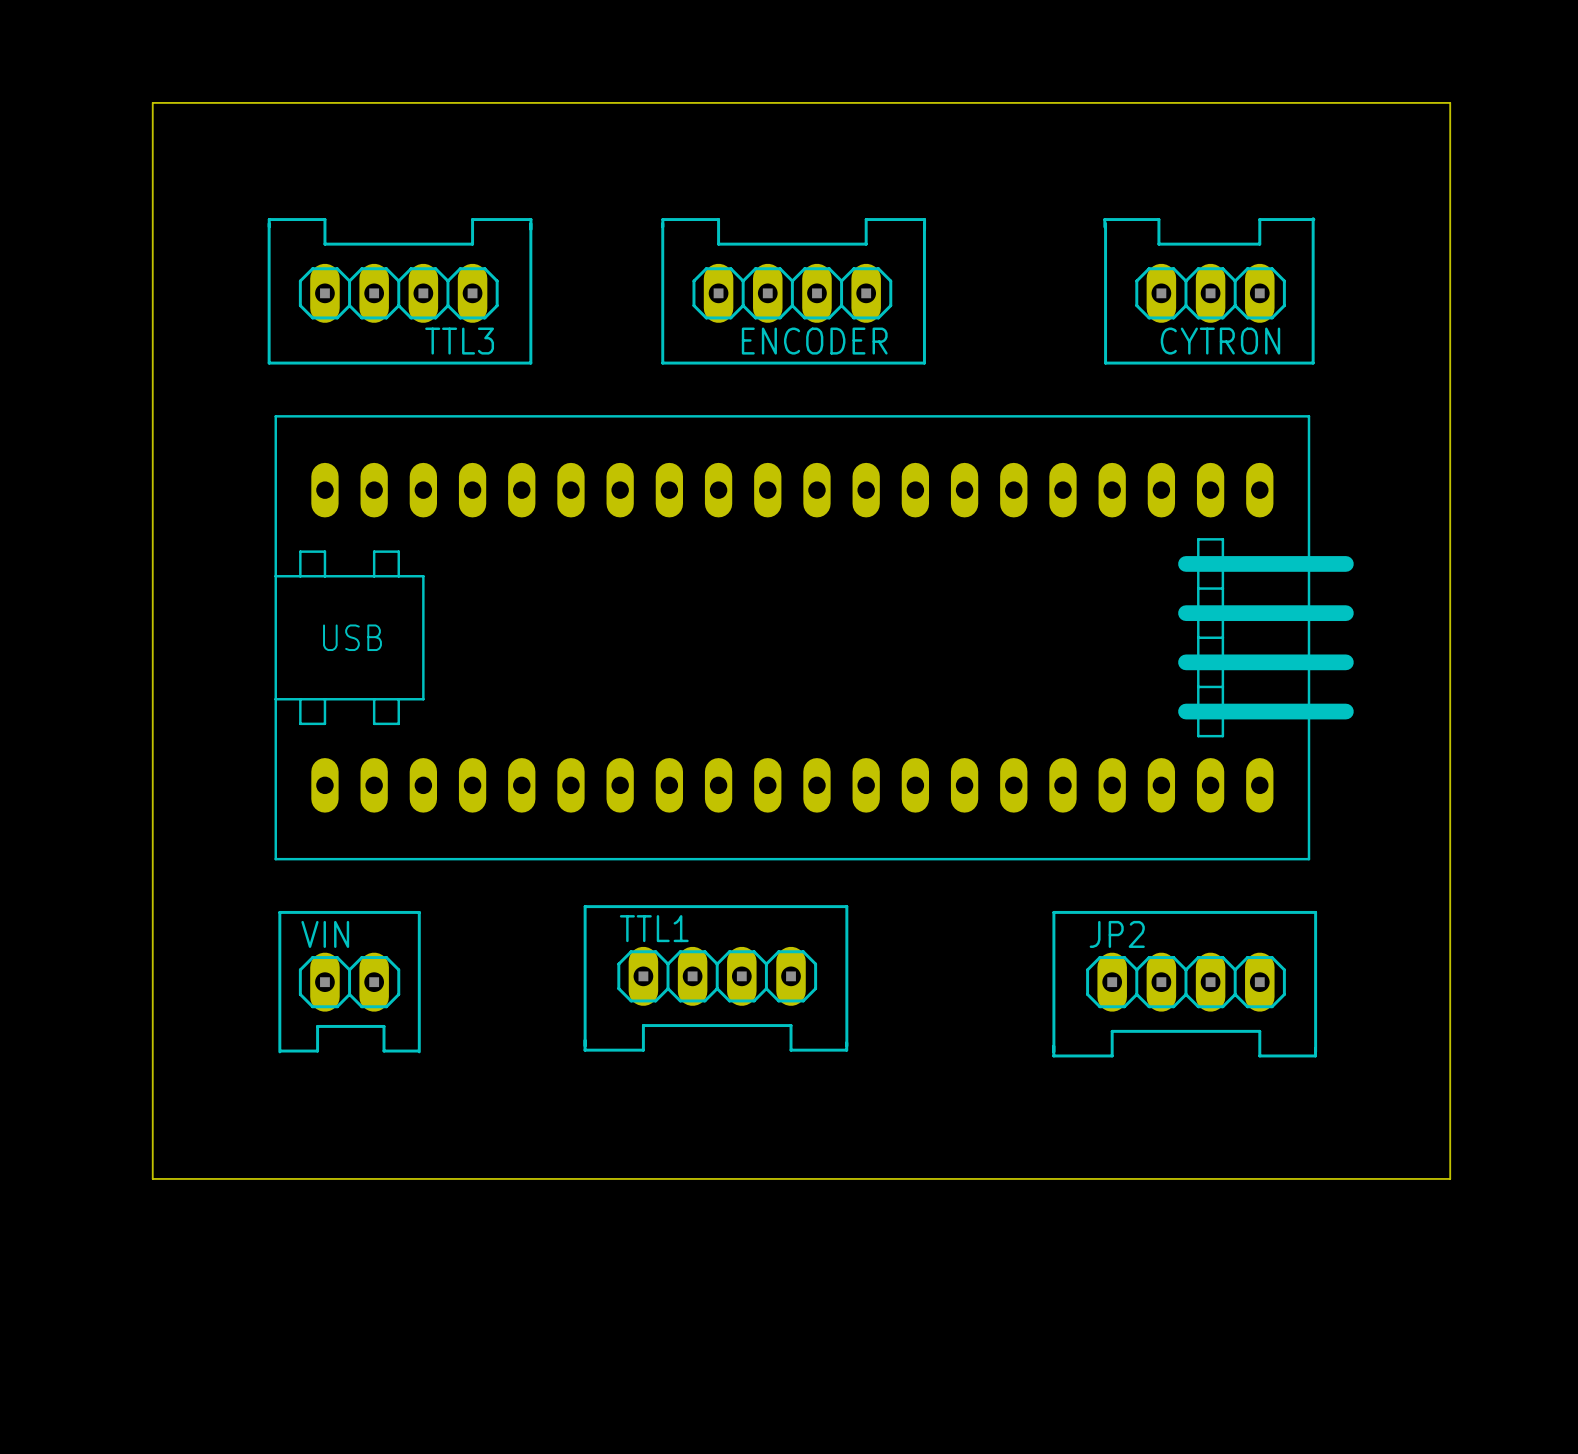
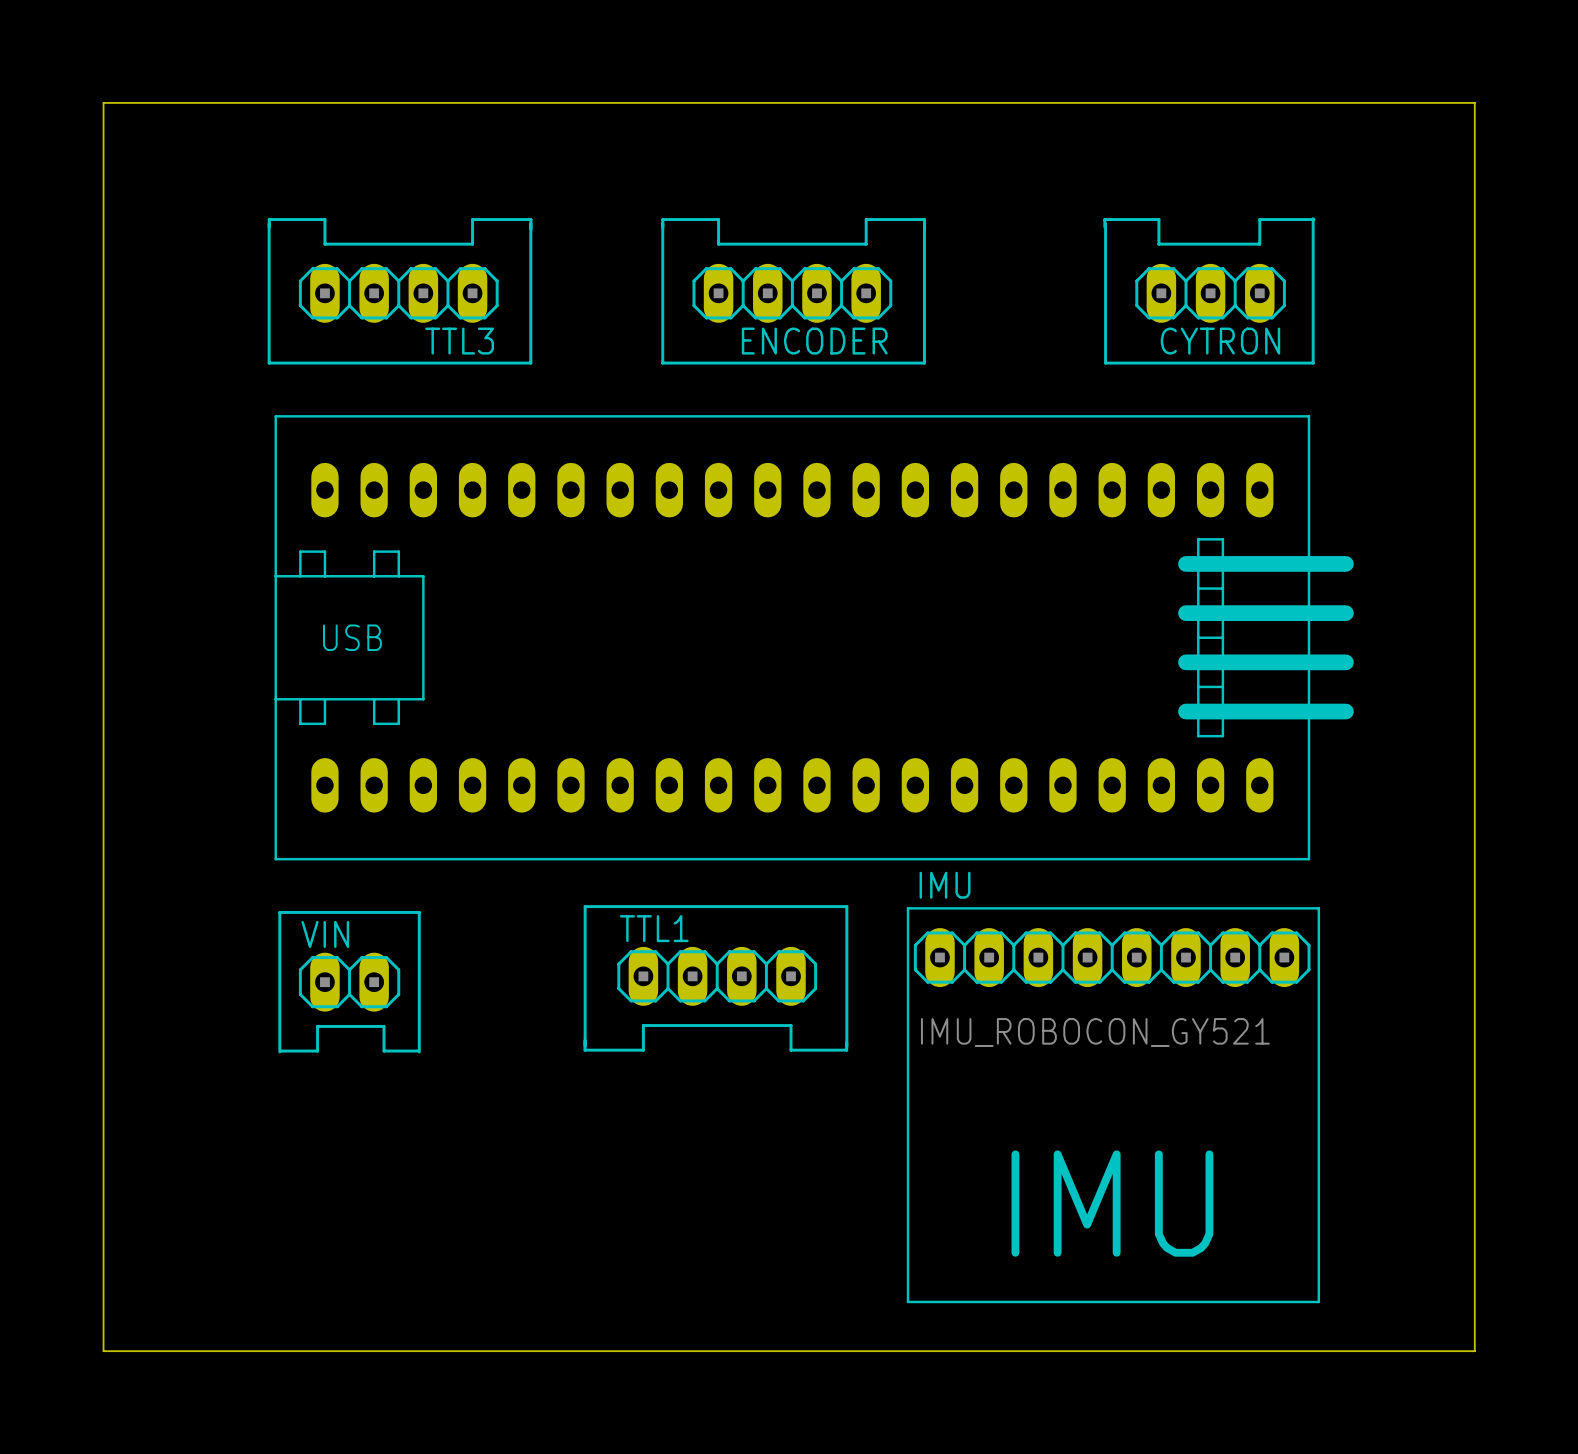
board edge: (152, 102) (152, 1178) (1450, 1178) (1450, 102) -> (152, 102) (103, 102) (103, 1351) (1474, 1351) (1474, 102) (1450, 102)
JP2: (1184, 984) -> none
IMU: none -> IMU_ROBOCON_GY521 (1113, 1105)

